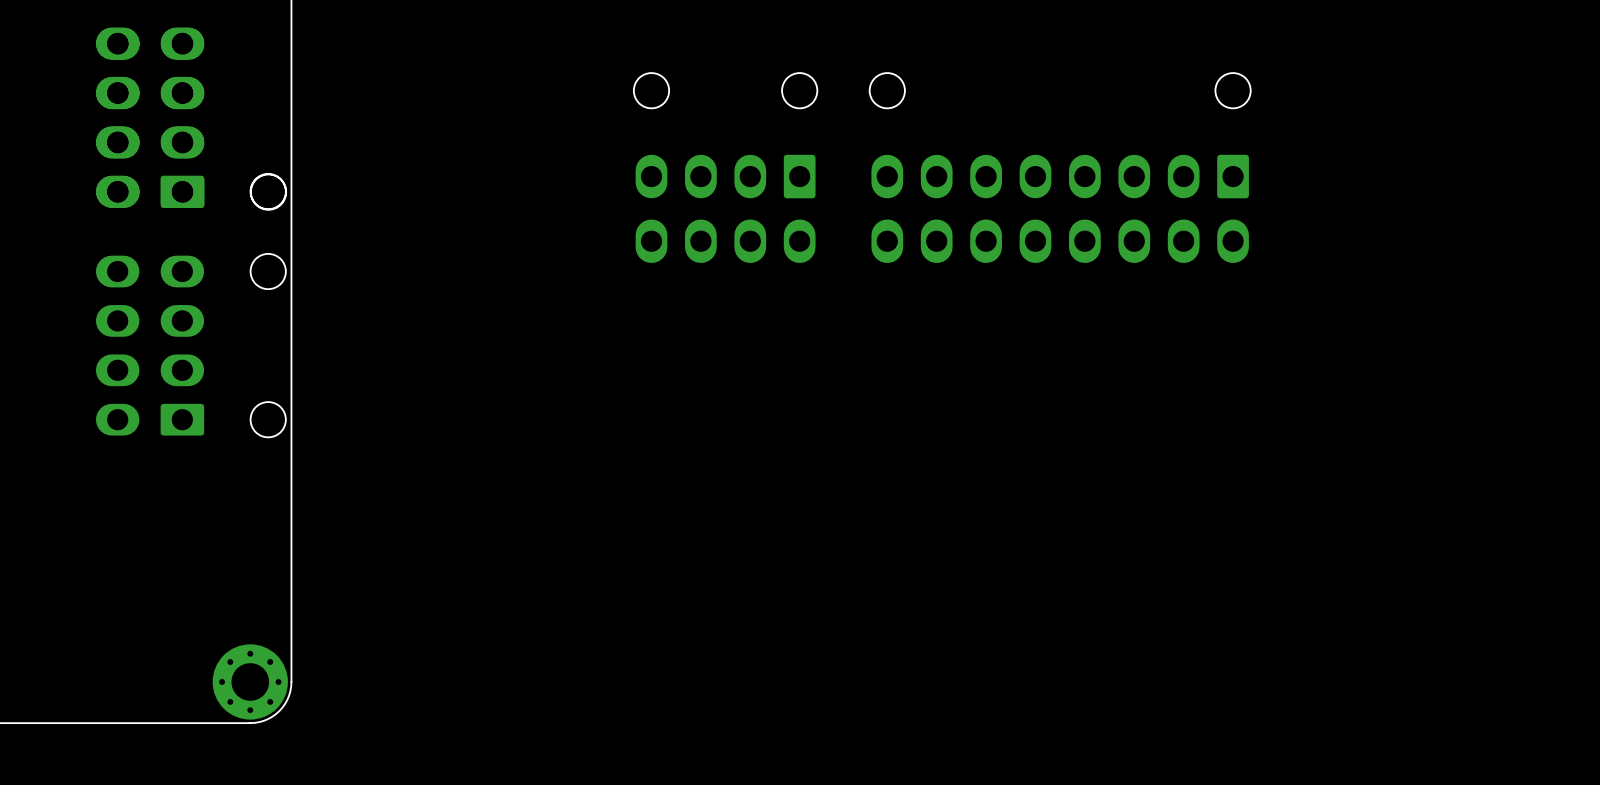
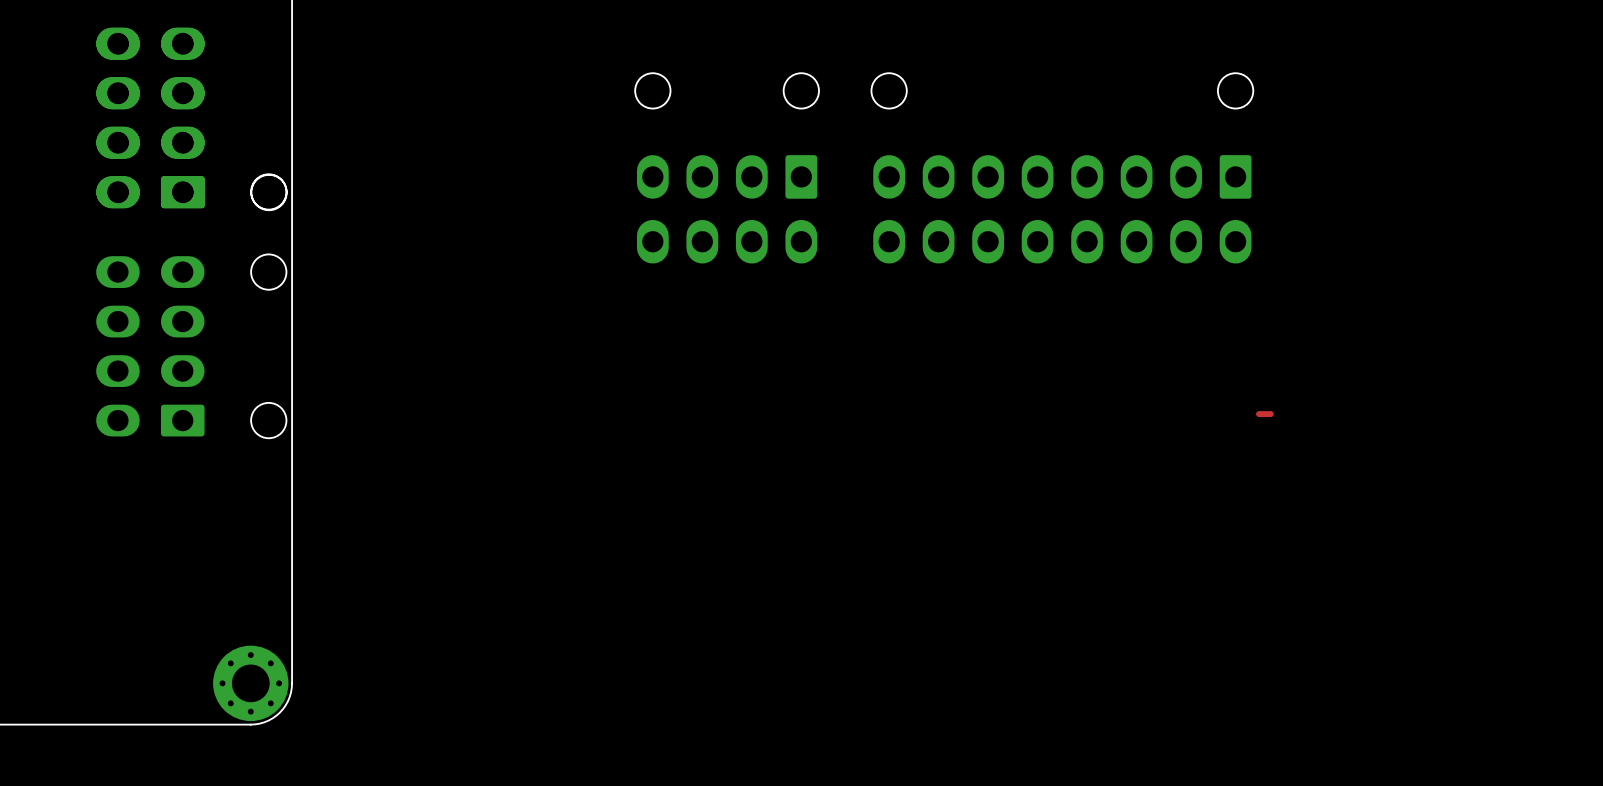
part: none -> (1264, 414)

